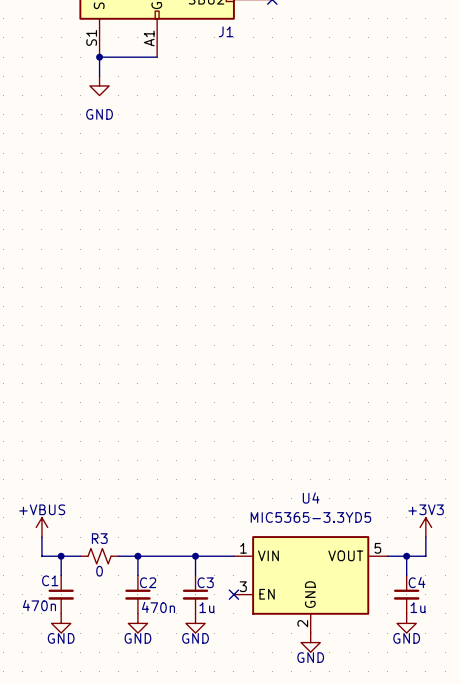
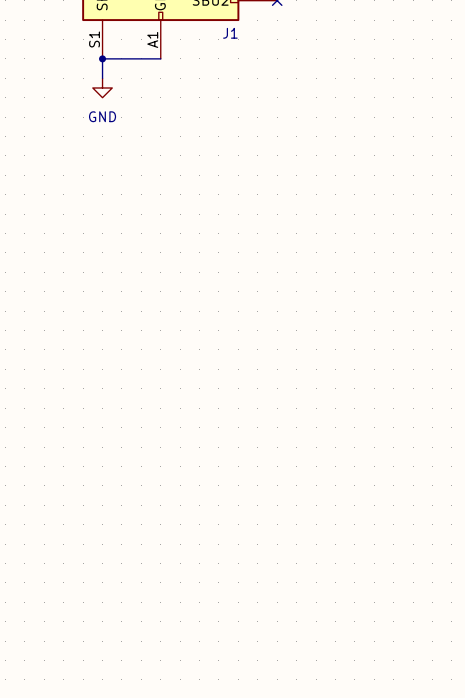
power symbol: +VBUS (41, 527) -> none
power symbol: +3V3 (425, 527) -> none
wire: (41, 537) (41, 556) (80, 556) -> none
wire: (425, 537) (425, 556) (387, 556) -> none
wire: (61, 556) (61, 575) -> none
junction: (61, 556) -> none
R3: 0 (99, 556) -> none
wire: (118, 556) (233, 556) -> none
wire: (137, 556) (137, 575) -> none
junction: (137, 556) -> none
wire: (195, 556) (195, 575) -> none
junction: (195, 556) -> none
wire: (406, 556) (406, 575) -> none
junction: (406, 556) -> none
U4: MIC5365-3.3YD5 (310, 584) -> none
C1: 470n (61, 594) -> none
C2: 470n (137, 594) -> none
C3: 1u (195, 594) -> none
no-connect mark: (233, 594) -> none
C4: 1u (406, 594) -> none
power symbol: GND (61, 623) -> none
power symbol: GND (137, 623) -> none
power symbol: GND (195, 623) -> none
power symbol: GND (406, 623) -> none
power symbol: GND (310, 642) -> none

